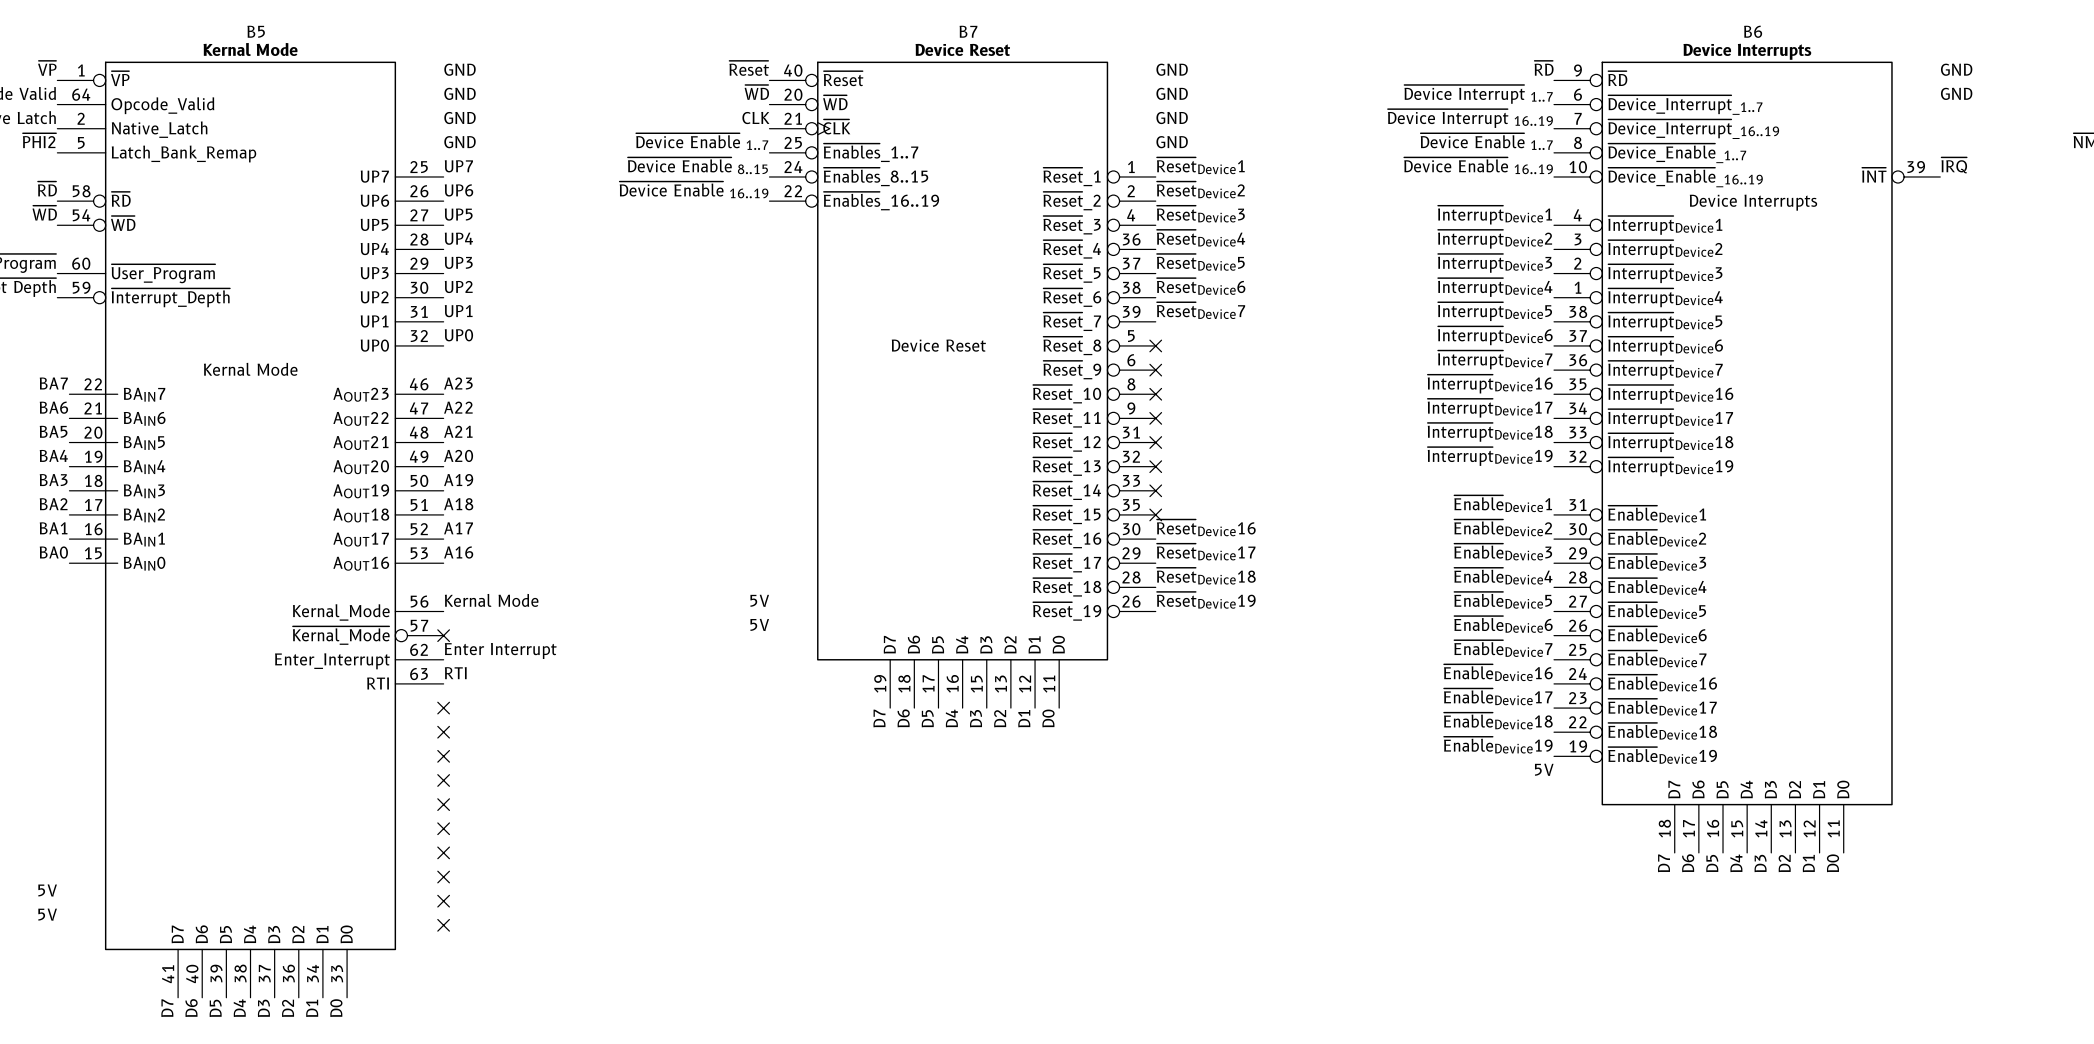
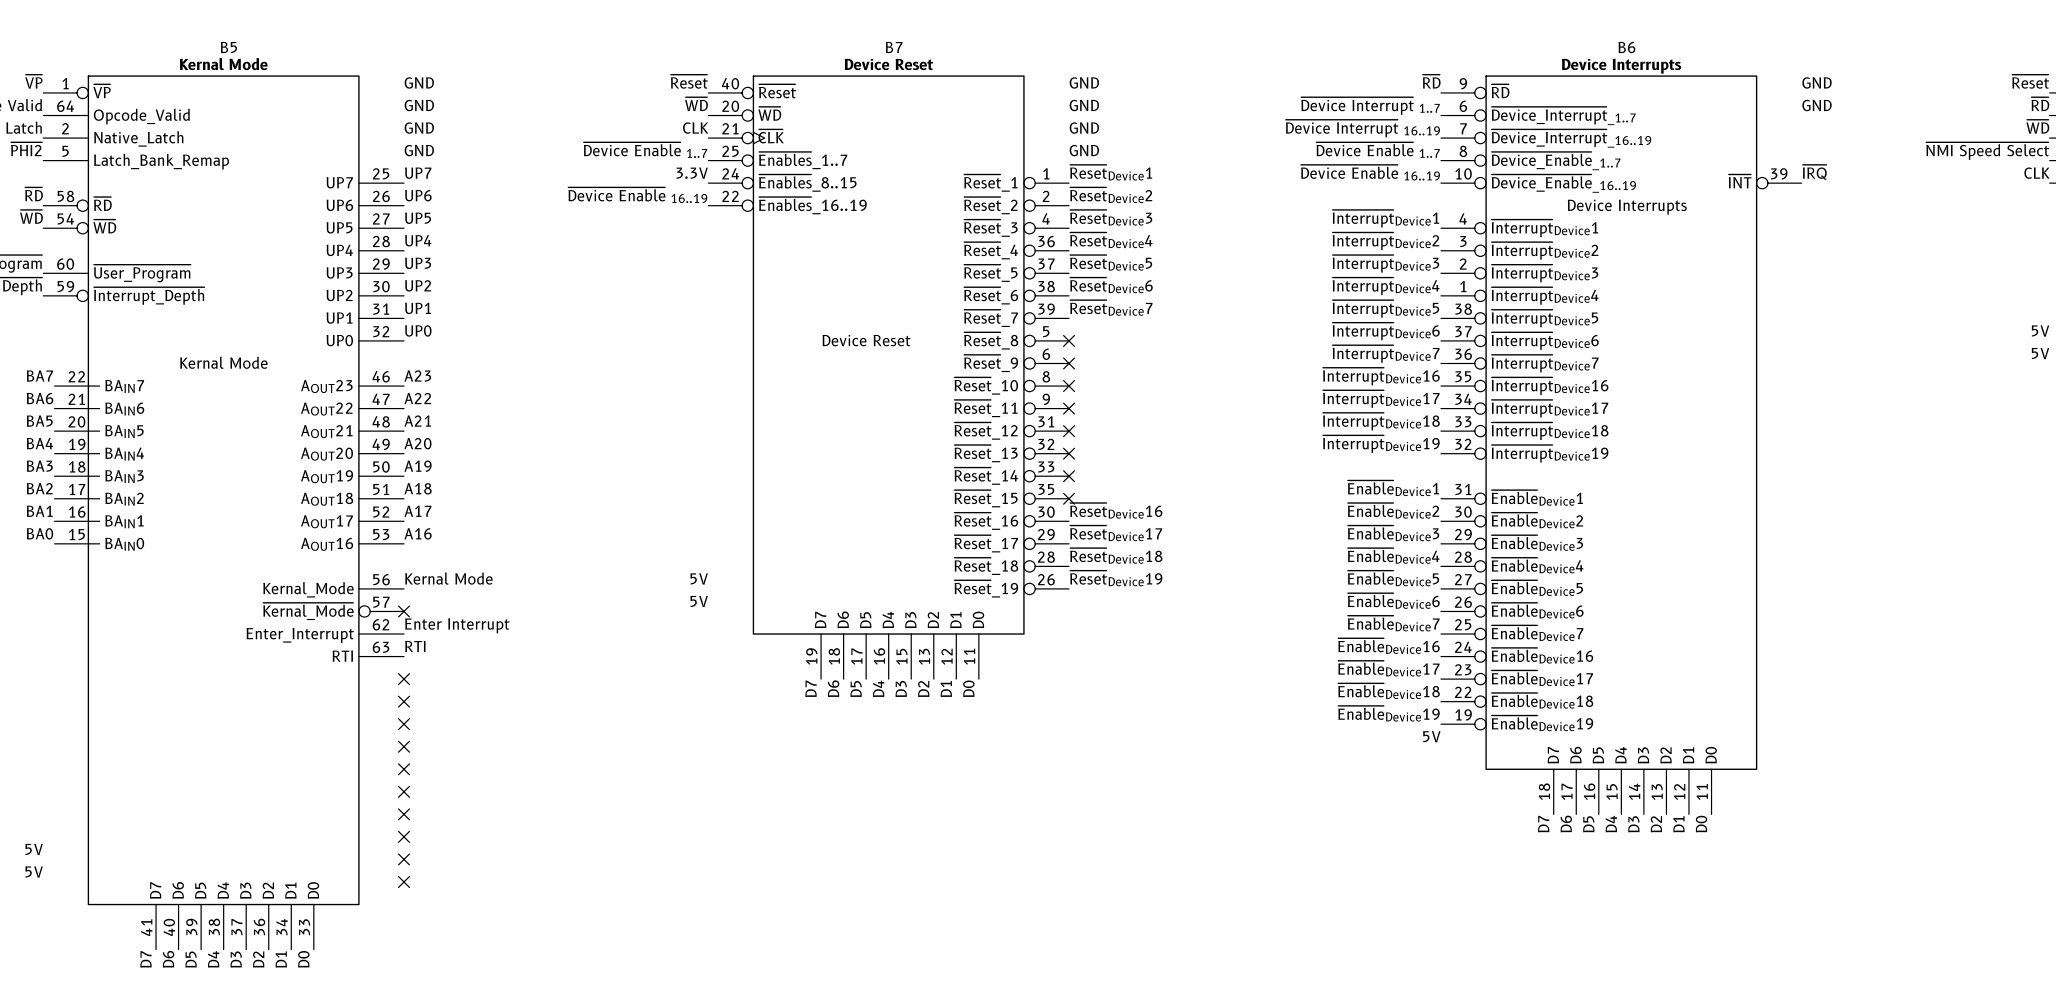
label: ~{Device Enable} 8..15 (697, 165) -> 3.3V (692, 173)

